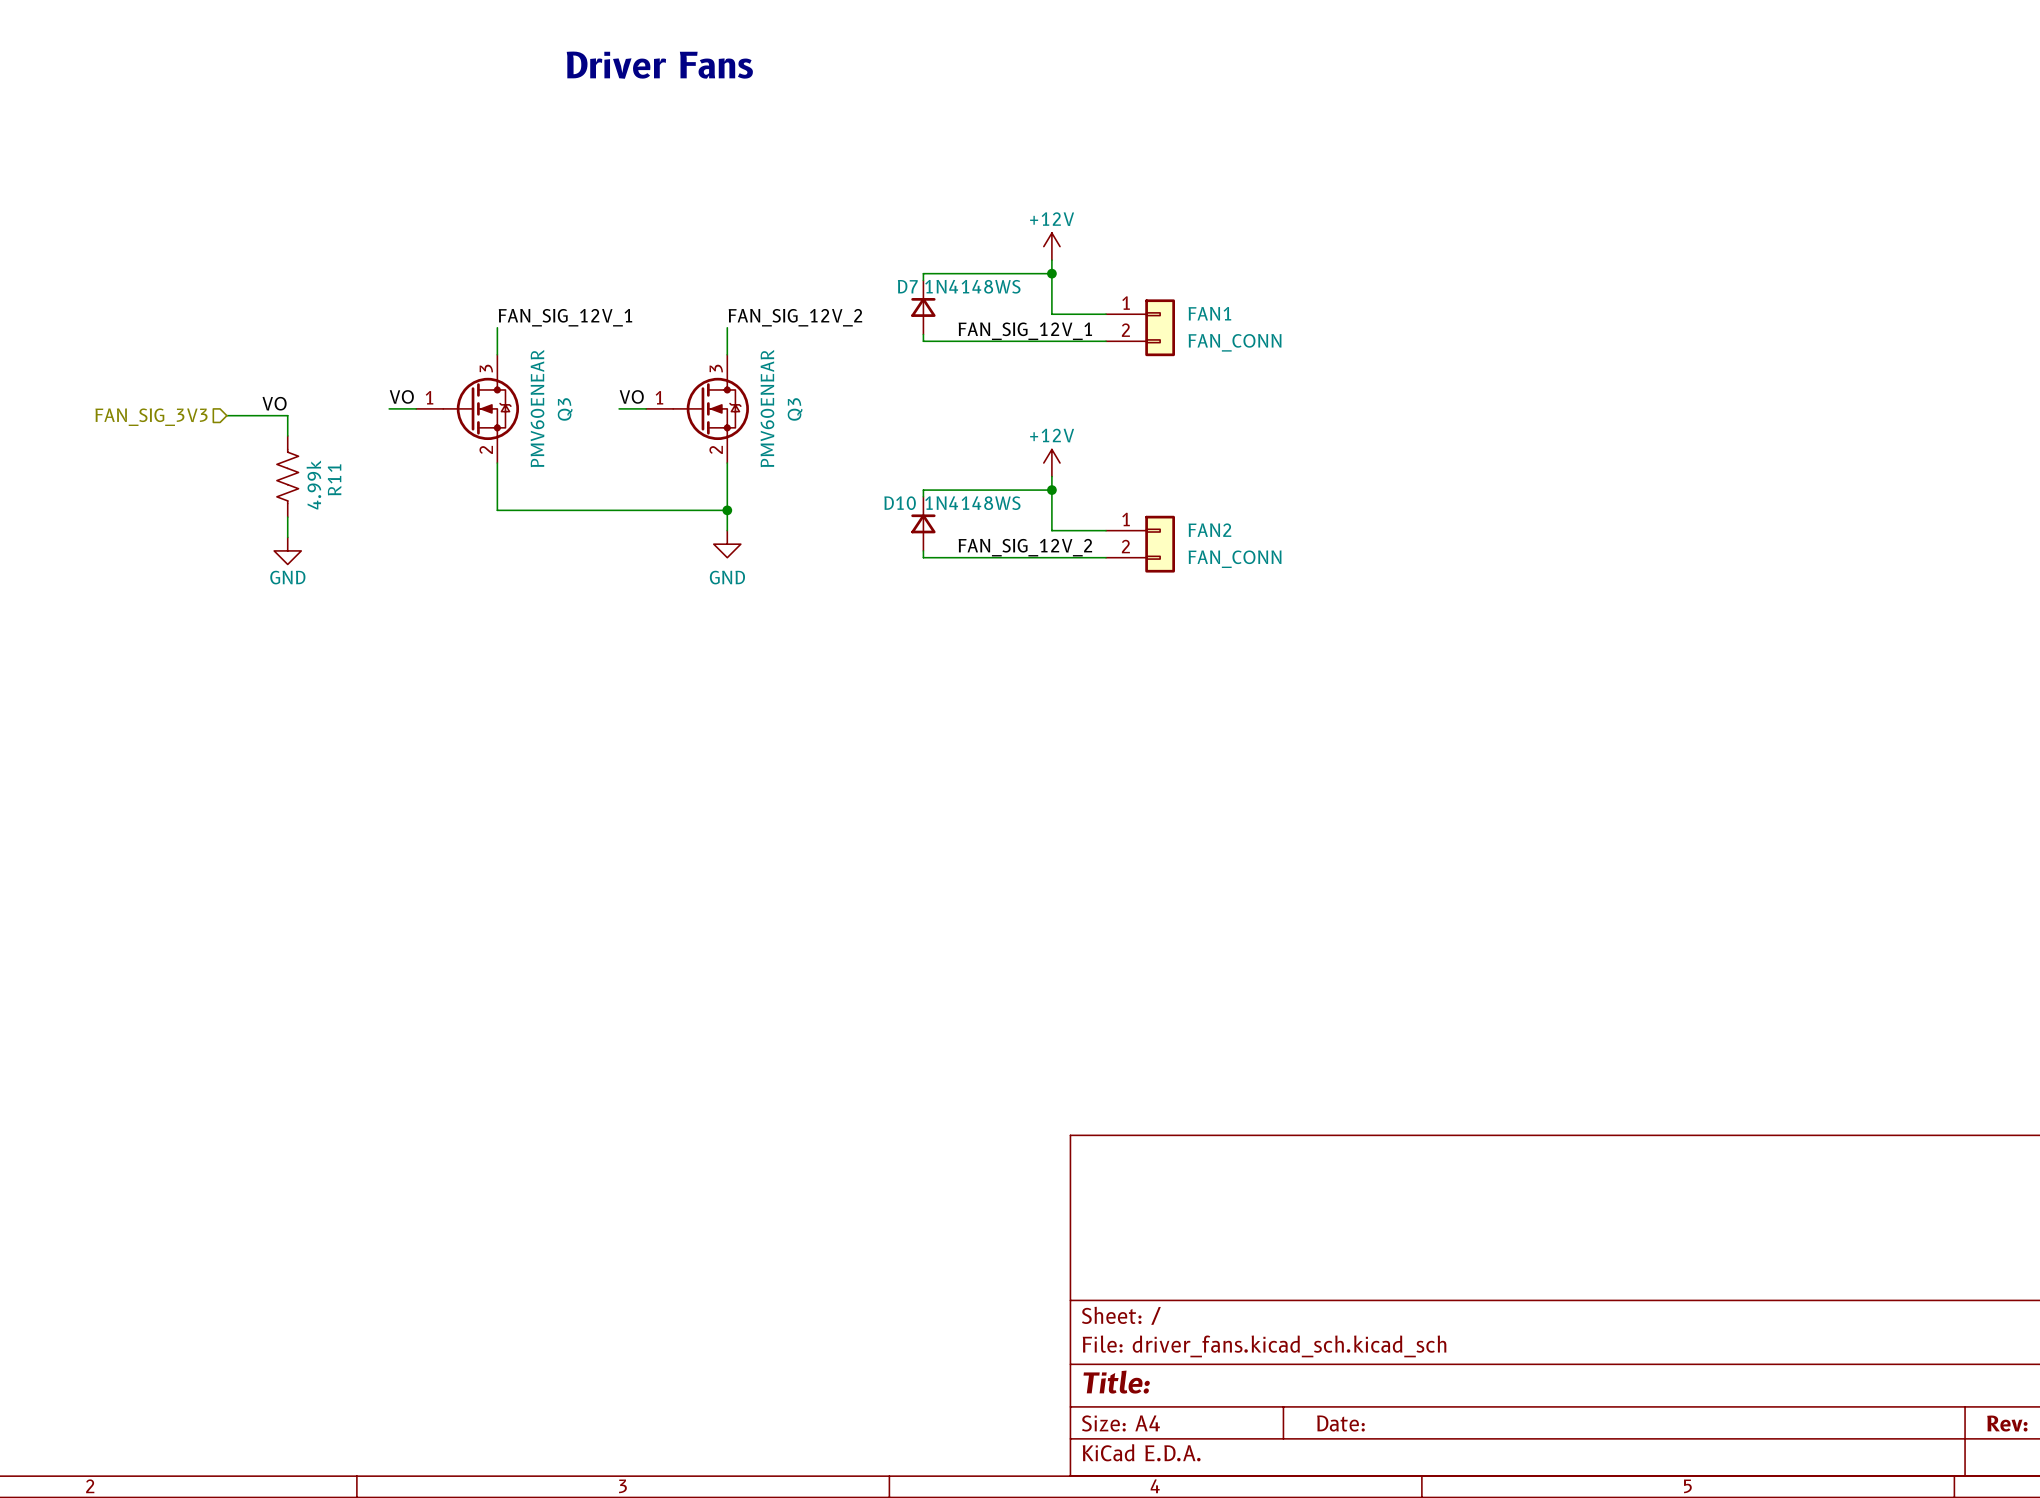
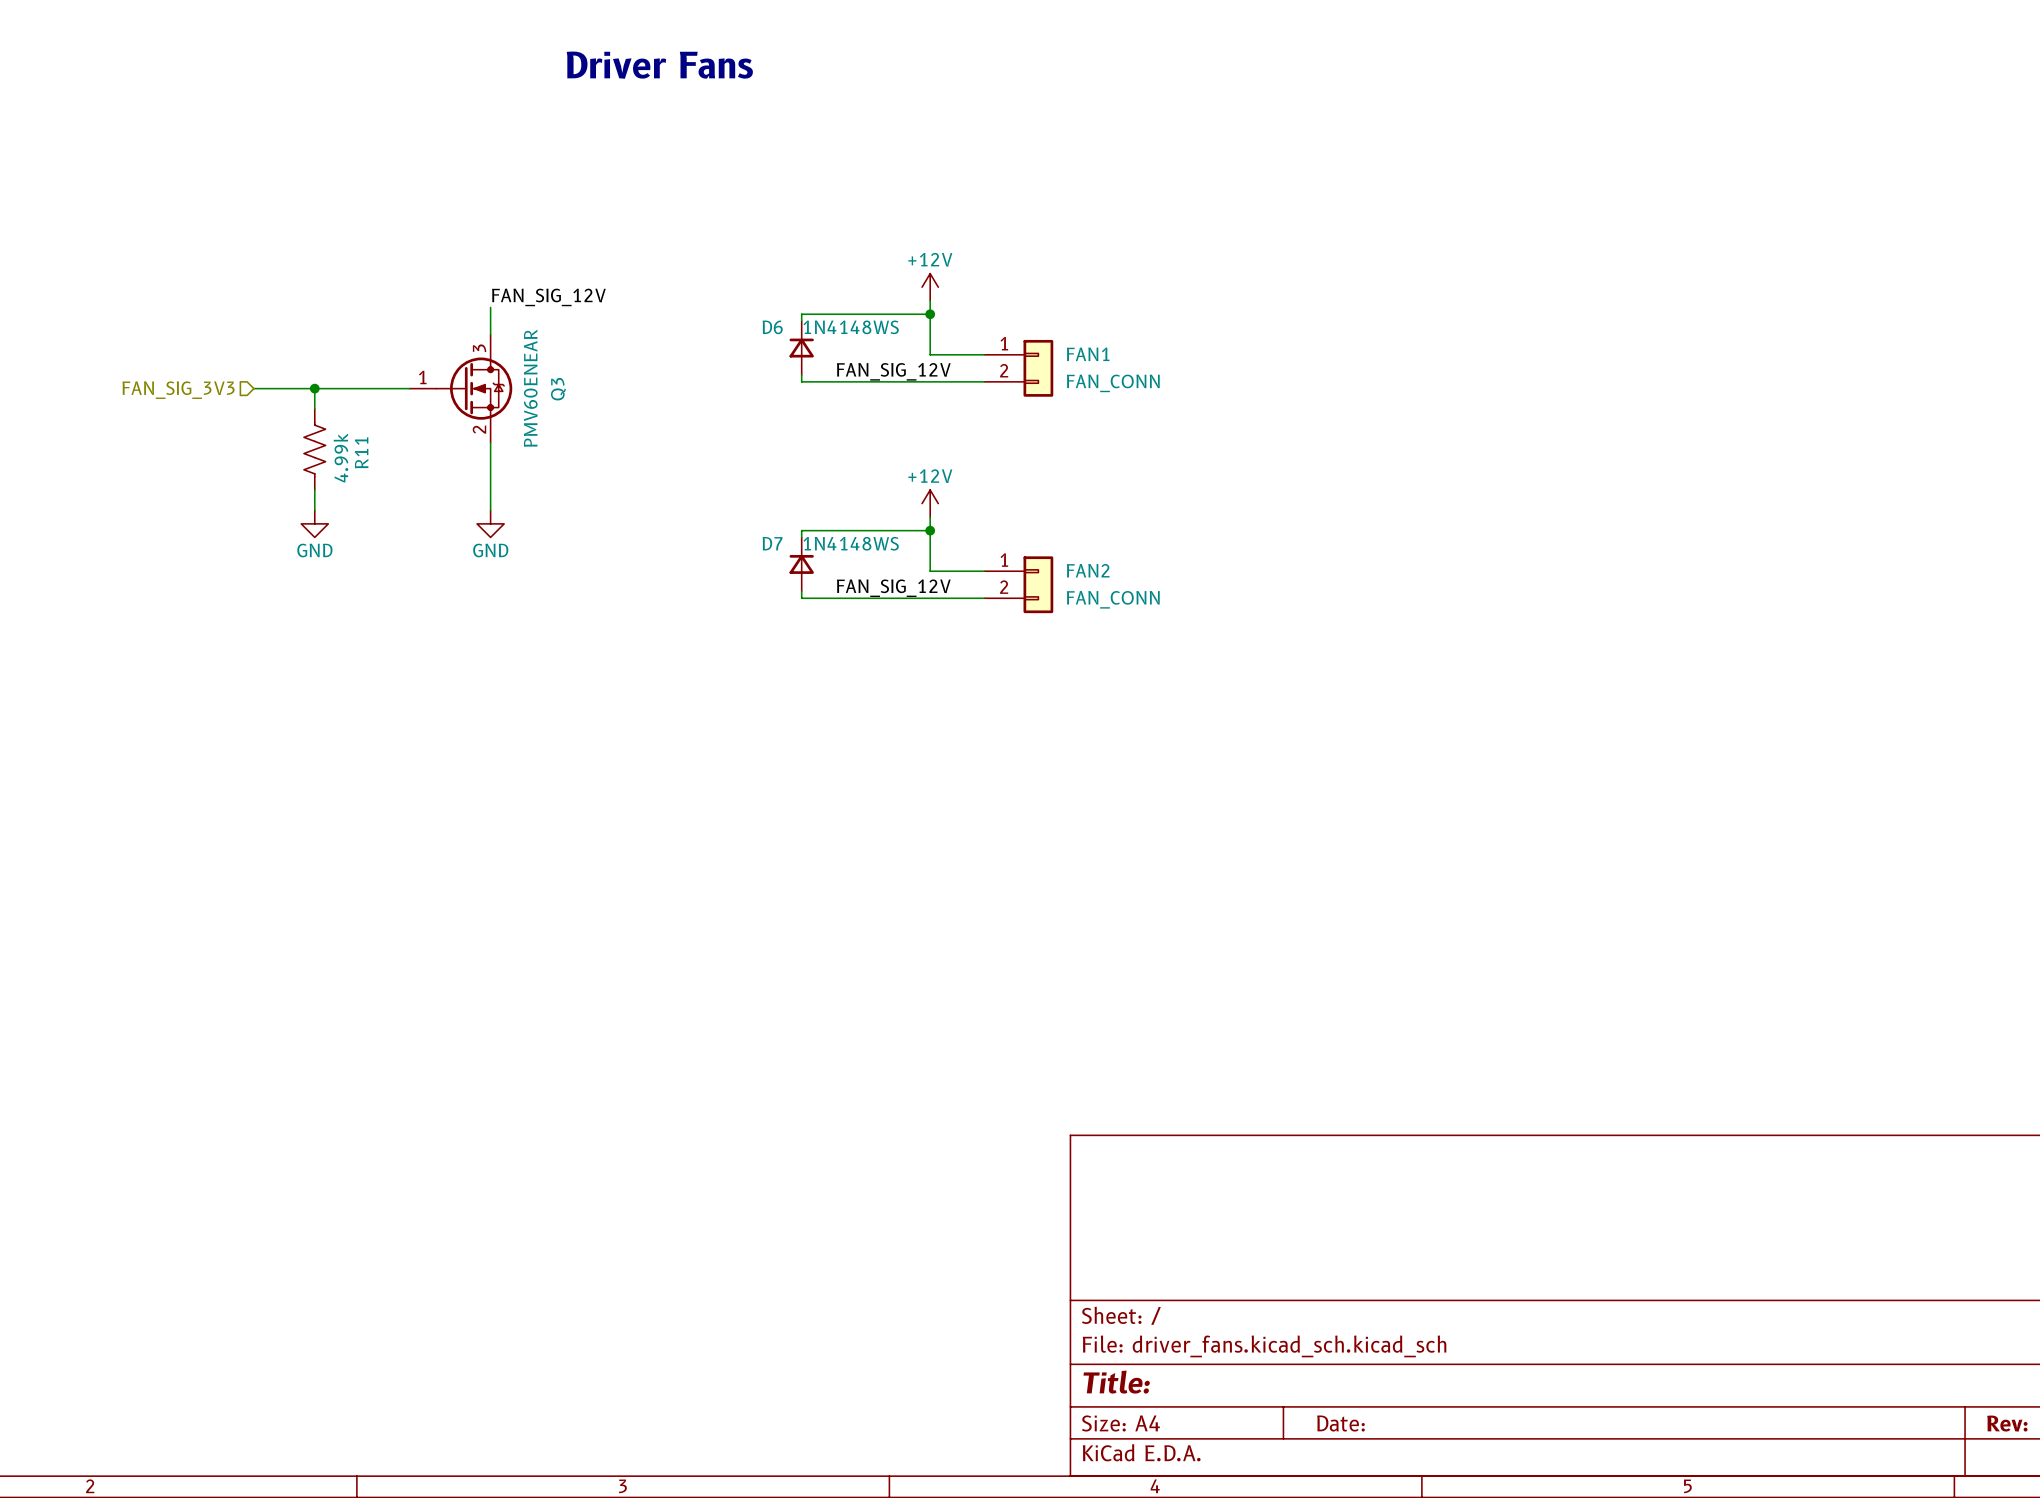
power symbol: +12V (1051, 246) -> none
wire: (1051, 260) (1051, 314) (1106, 314) -> (930, 300) (930, 354) (984, 354)
wire: (1051, 273) (923, 273) (923, 280) -> (930, 314) (801, 314) (801, 321)
junction: (1051, 273) -> none
D7 name position: D7 (907, 286) -> D7 (772, 543)
power symbol: none -> +12V (930, 287)
D7 position: (923, 307) -> (801, 564)
junction: none -> (930, 314)
label: FAN_SIG_12V_1 (565, 317) -> FAN_SIG_12V (548, 297)
label: FAN_SIG_12V_2 (795, 317) -> none
wire: (497, 327) (497, 354) -> none
wire: (727, 327) (727, 354) -> (490, 307) (490, 334)
FAN1 position: (1140, 327) -> (1018, 368)
label: FAN_SIG_12V_1 (1025, 331) -> none
wire: (923, 334) (923, 341) (1106, 341) -> (801, 375) (801, 381) (984, 381)
D6: none -> 1N4148WS (801, 348)
label: none -> FAN_SIG_12V (893, 371)
wire: none -> (253, 388) (409, 388)
wire: none -> (314, 388) (314, 408)
junction: none -> (314, 388)
label: VO (401, 396) -> none
label: VO (631, 396) -> none
label: VO (274, 403) -> none
wire: (389, 408) (416, 408) -> none
Q3 position: (467, 408) -> (460, 388)
wire: (619, 408) (646, 408) -> none
Q3: PMV60ENEAR (697, 408) -> none
wire: (226, 415) (287, 415) (287, 435) -> none
hierarchical label position: FAN_SIG_3V3 (151, 417) -> FAN_SIG_3V3 (178, 390)
wire: (497, 463) (497, 510) (727, 510) -> none
wire: (727, 463) (727, 530) -> (490, 442) (490, 510)
power symbol: +12V (1051, 463) -> none
R11 position: (287, 476) -> (314, 449)
wire: (1051, 476) (1051, 530) (1106, 530) -> (930, 517) (930, 571) (984, 571)
wire: (1051, 490) (923, 490) (923, 496) -> (930, 530) (801, 530) (801, 537)
junction: (1051, 490) -> none
power symbol: none -> +12V (930, 503)
junction: (727, 510) -> none
wire: (287, 517) (287, 537) -> (314, 490) (314, 510)
power symbol: none -> GND (490, 523)
D10: 1N4148WS (923, 523) -> none
junction: none -> (930, 530)
power symbol: GND (727, 544) -> none
FAN2 position: (1140, 544) -> (1018, 584)
label: FAN_SIG_12V_2 (1025, 547) -> none
power symbol position: GND (287, 550) -> GND (314, 523)
wire: (923, 550) (923, 557) (1106, 557) -> (801, 591) (801, 598) (984, 598)
label: none -> FAN_SIG_12V (893, 588)

